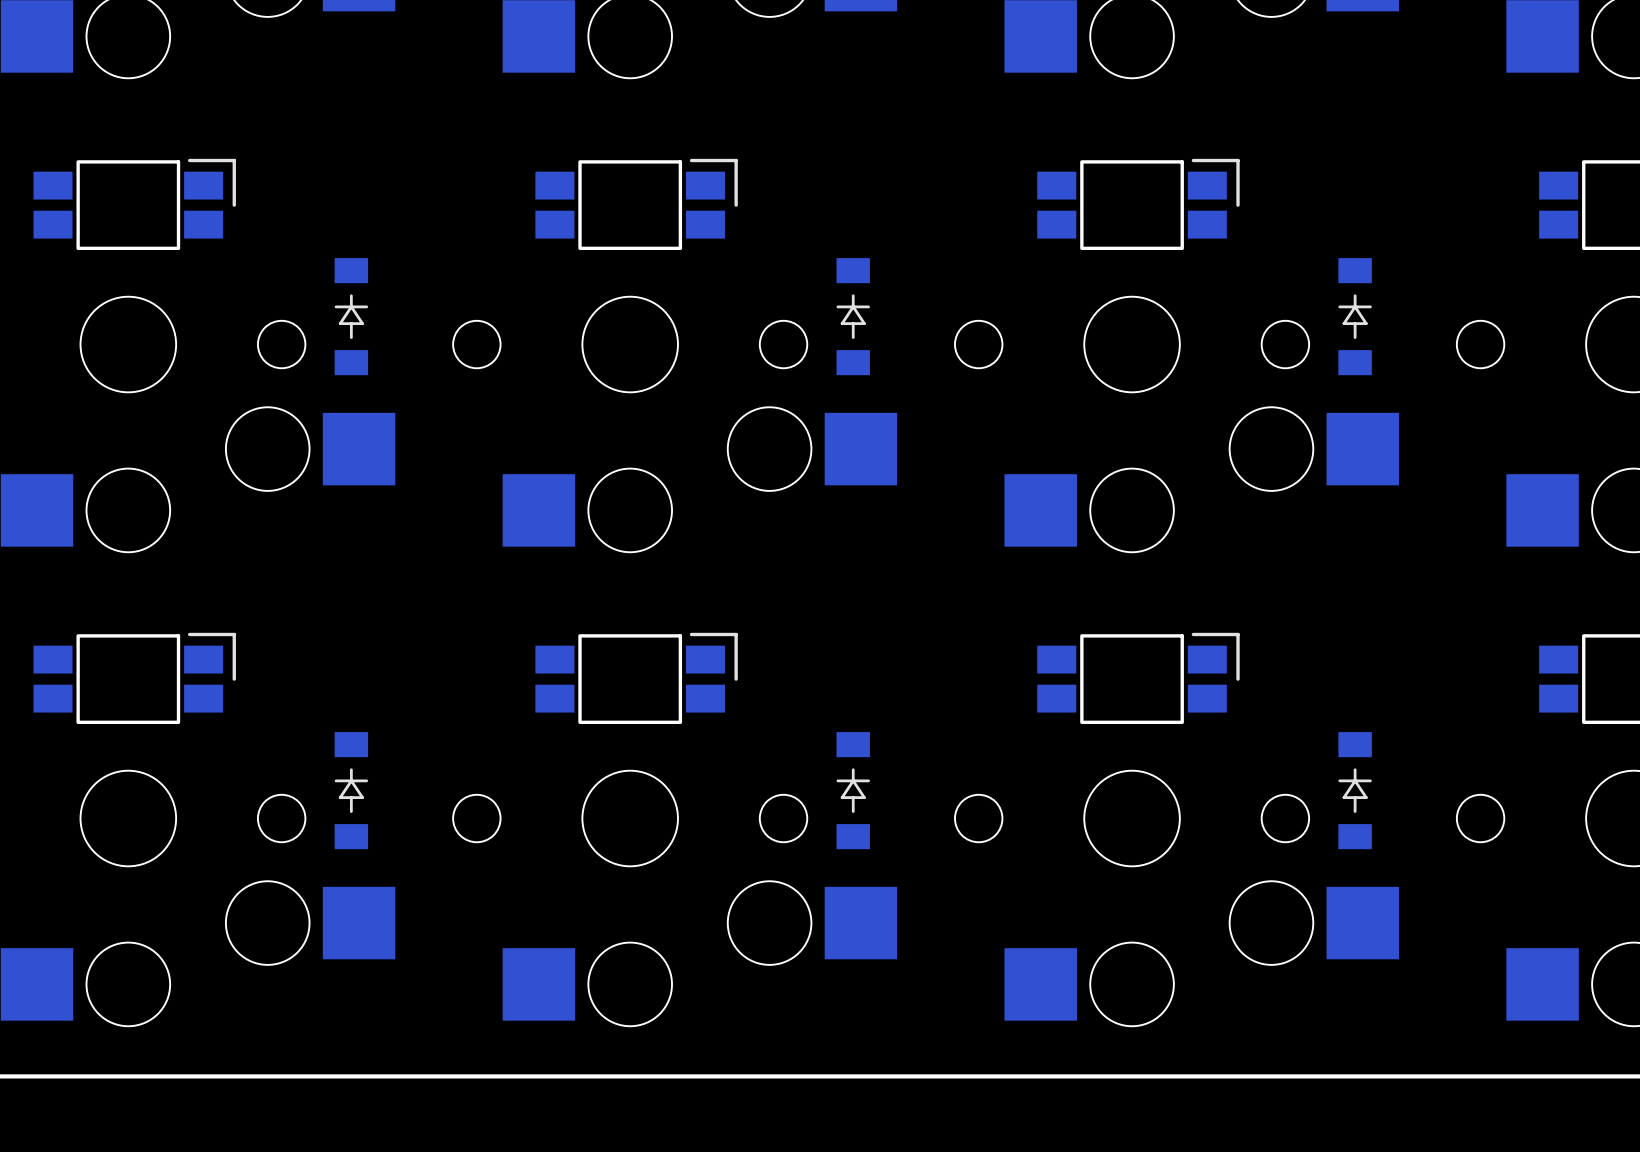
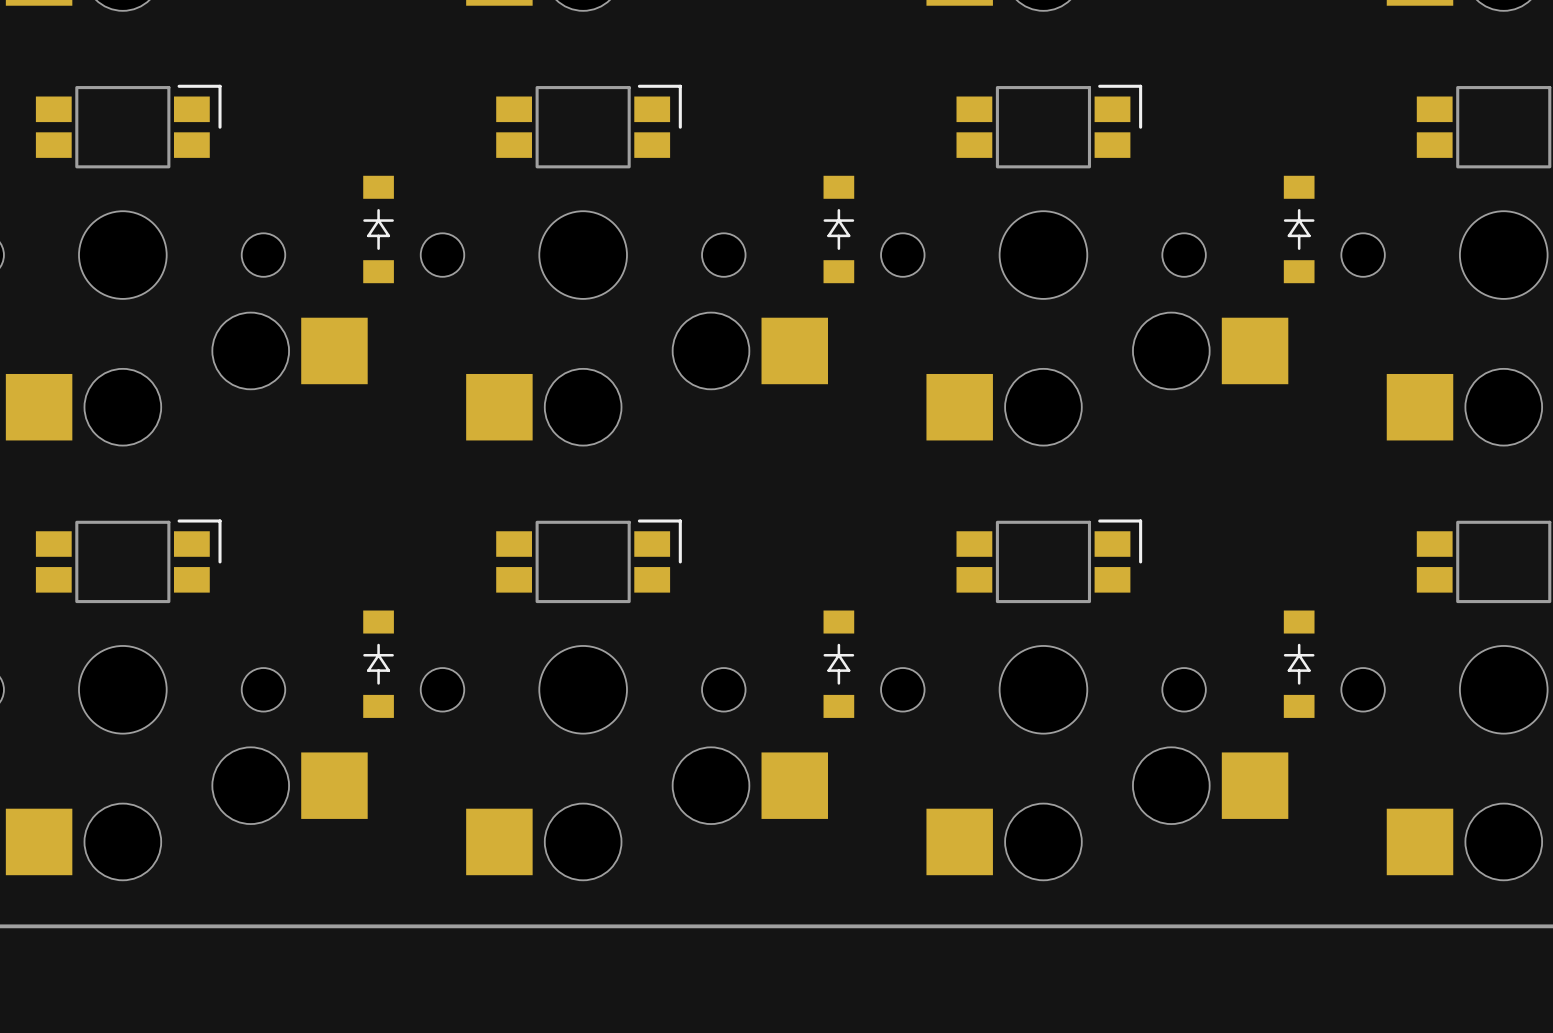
part position: (351, 316) -> (378, 229)
part position: (853, 316) -> (838, 229)
part position: (1355, 316) -> (1299, 229)
part position: (351, 790) -> (378, 664)
part position: (853, 790) -> (838, 664)
part position: (1355, 790) -> (1299, 664)

